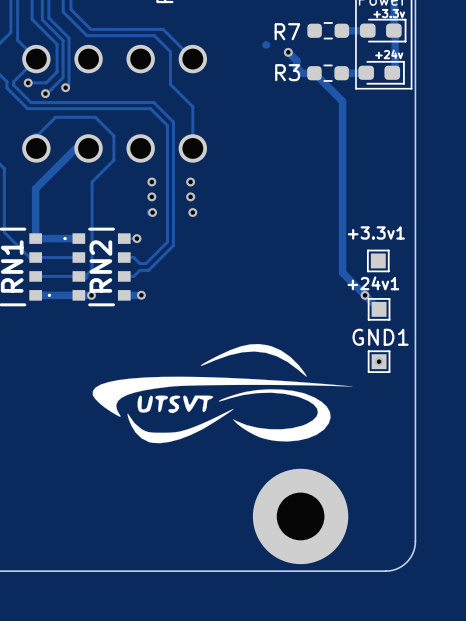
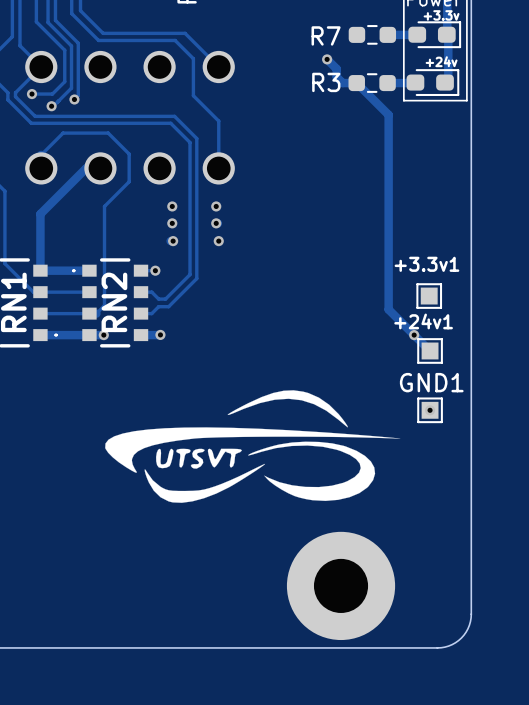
track: (265, 44) (266, 44) -> none

